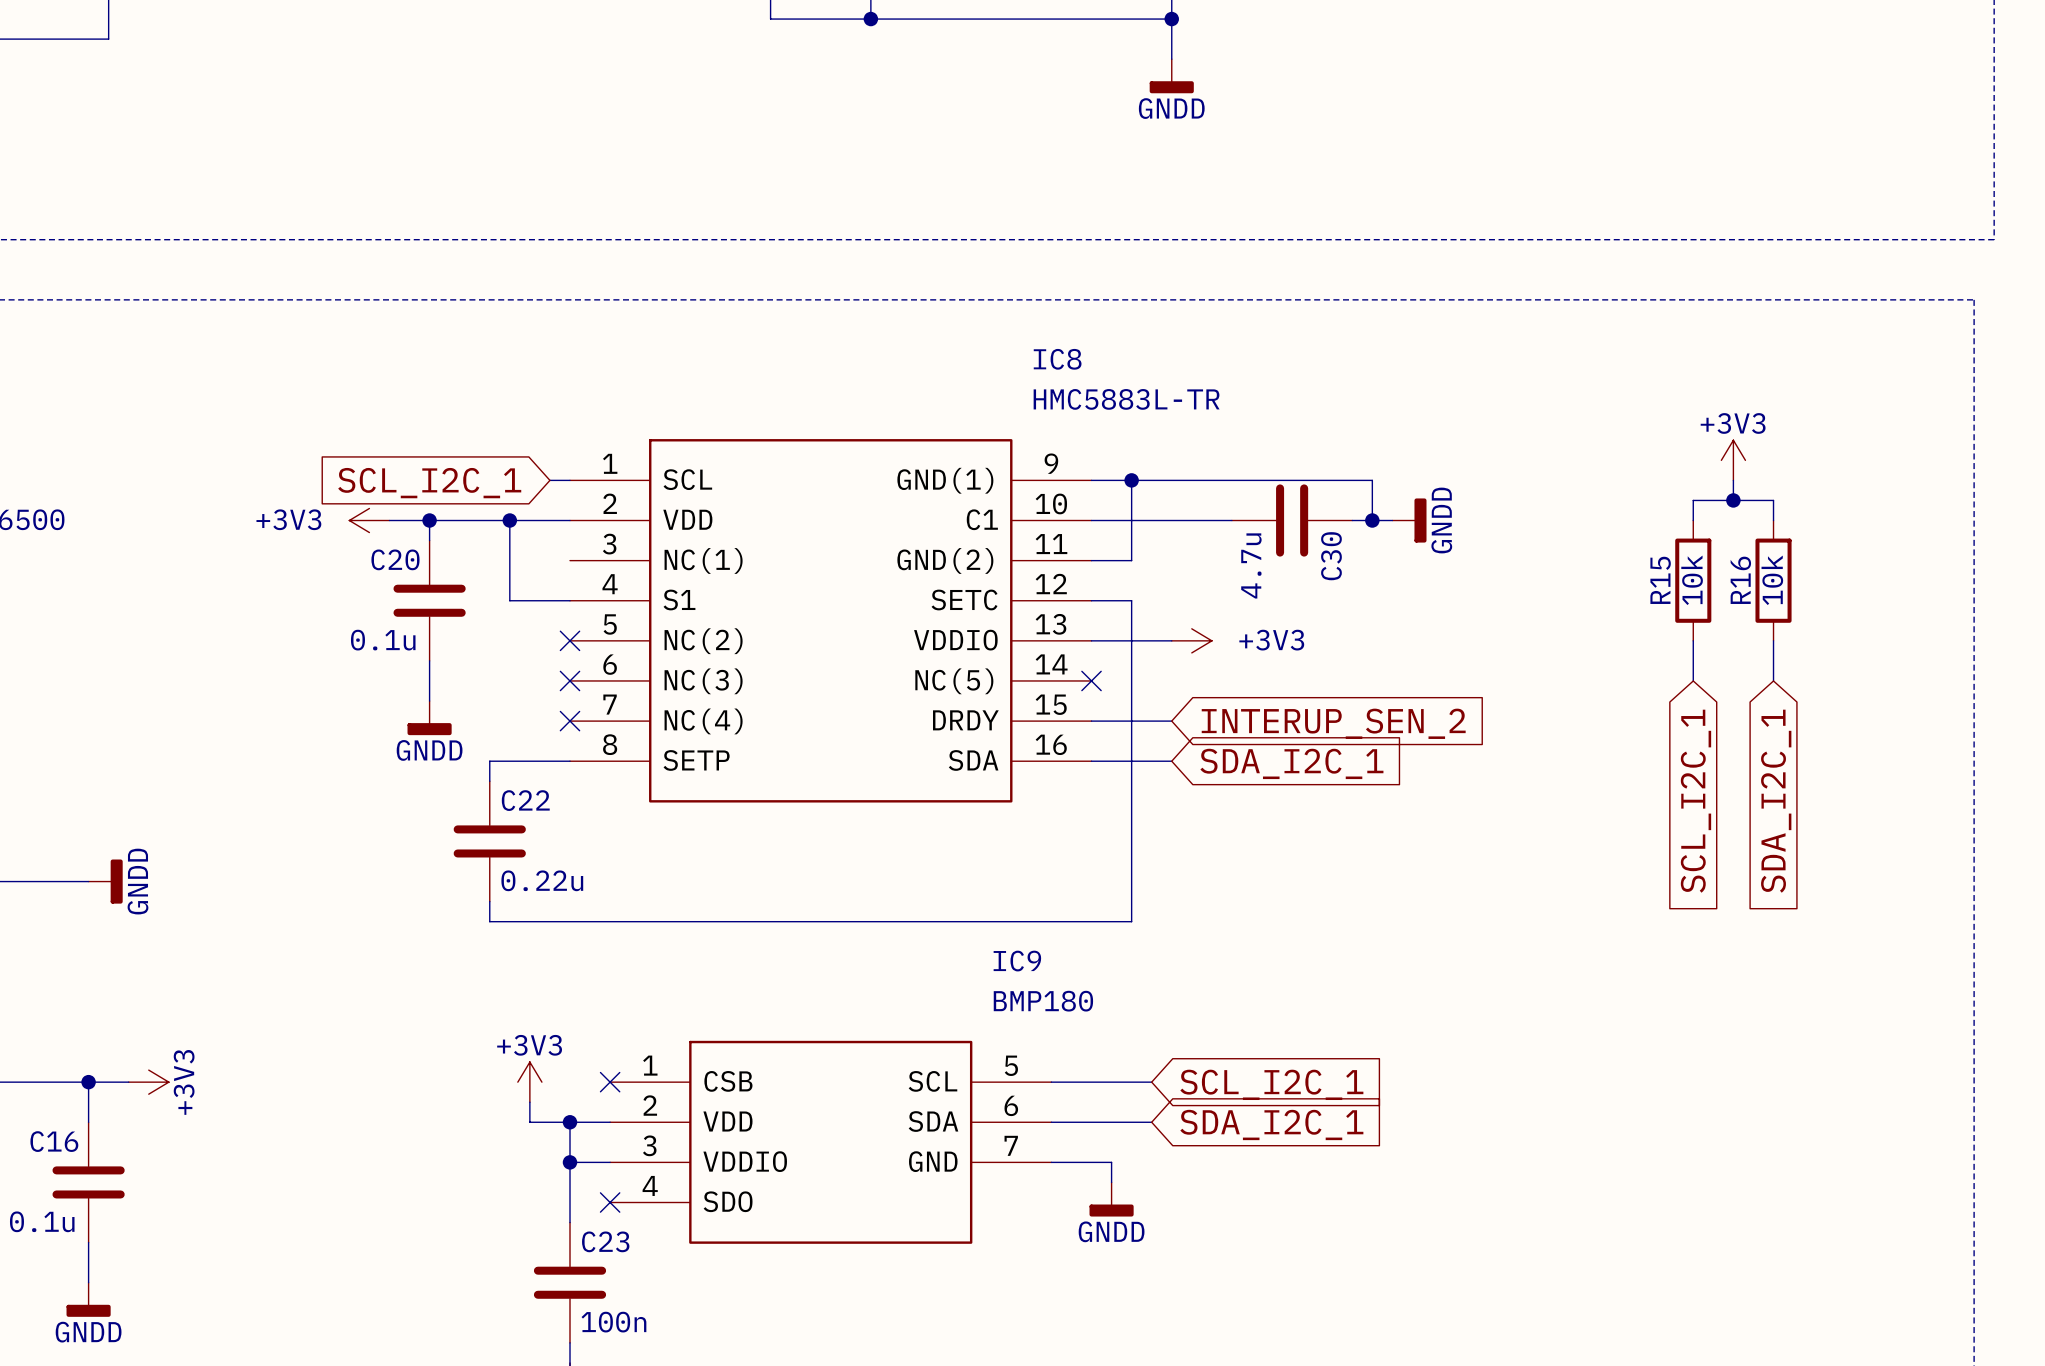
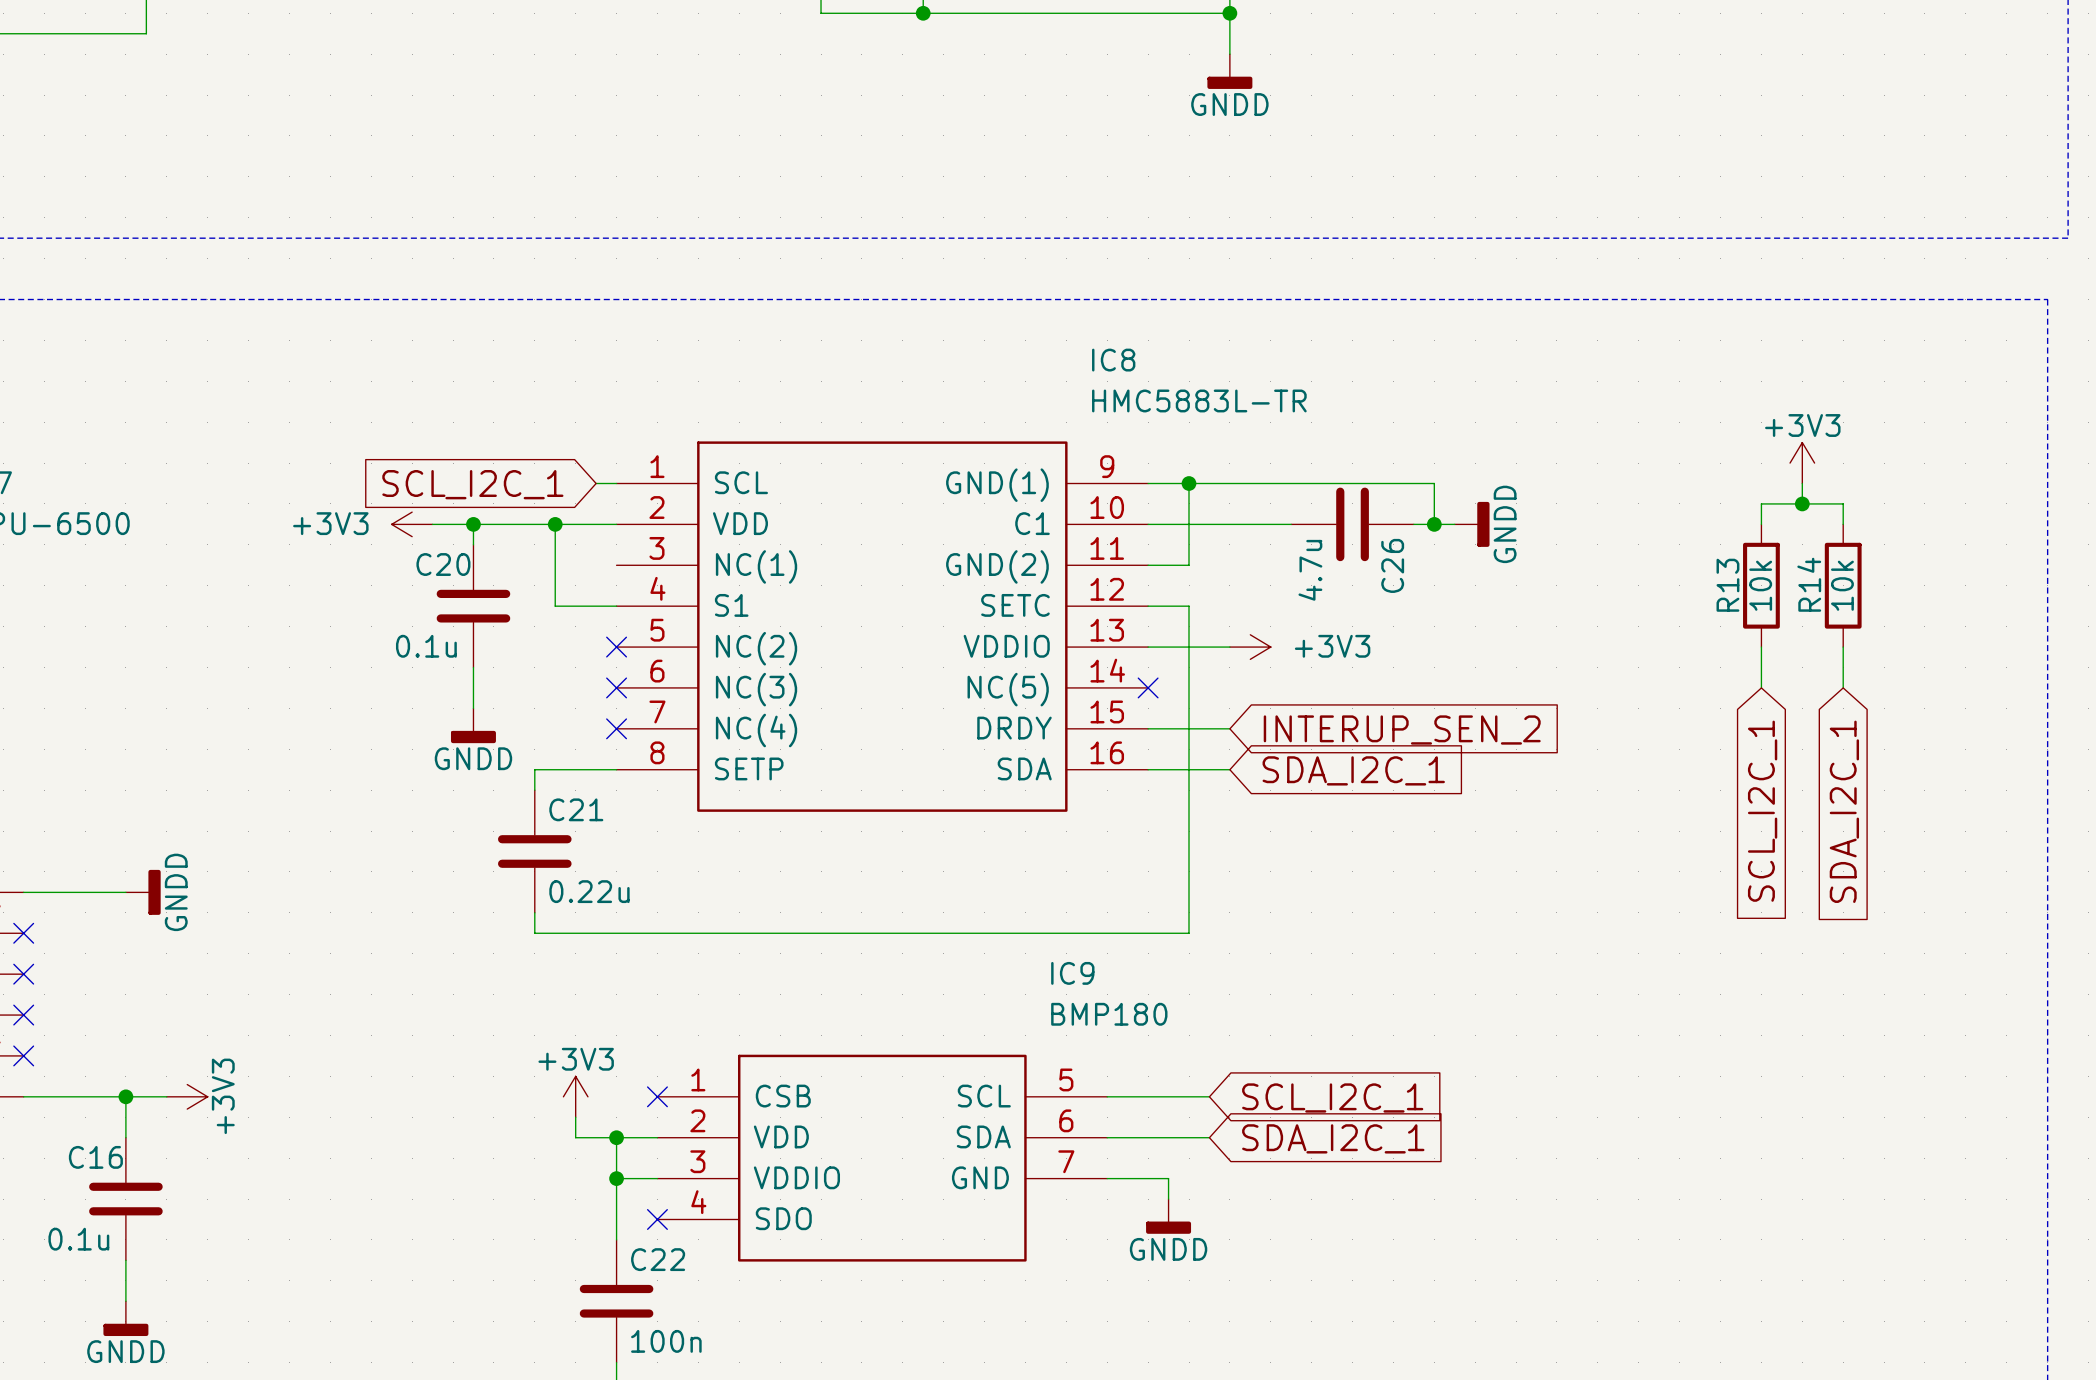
C30 name: C30 (1331, 556) -> C26 (1392, 565)
R15 name: R15 (1660, 580) -> R13 (1727, 585)
R16 name: R16 (1740, 580) -> R14 (1809, 584)
C22 name: C22 (525, 800) -> C21 (576, 809)
C23 name: C23 (605, 1241) -> C22 (658, 1259)

